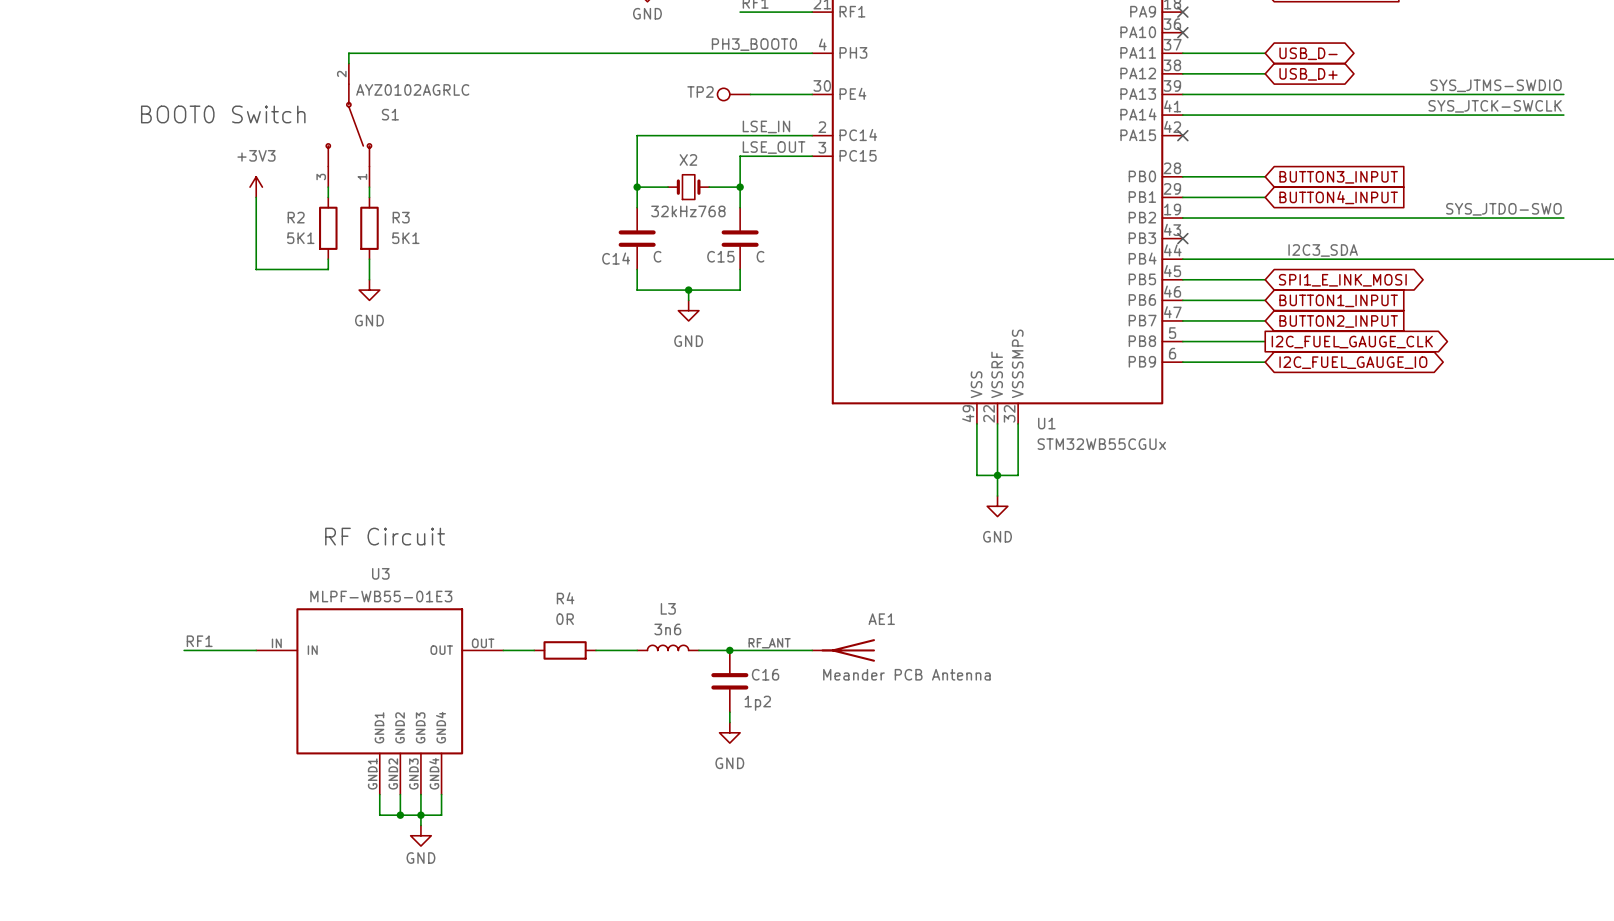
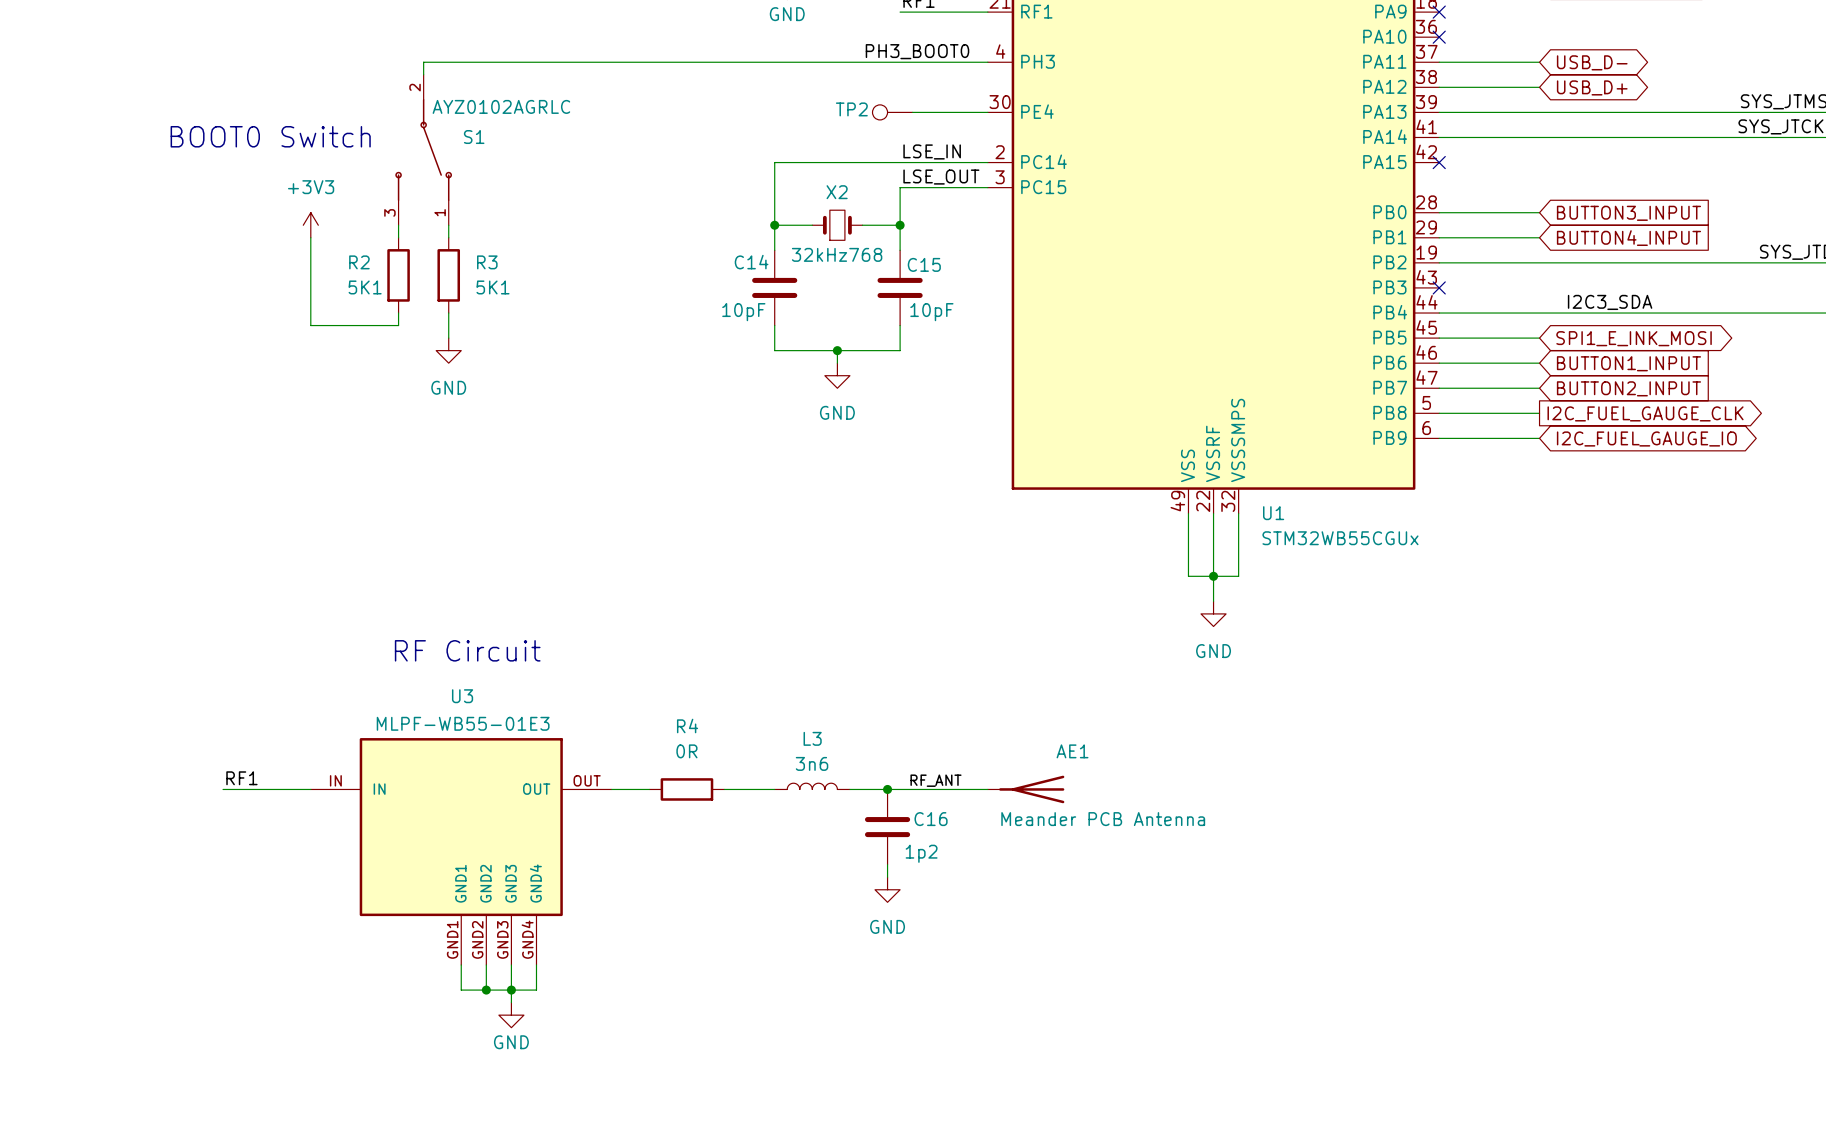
C14 value: C (657, 256) -> 10pF (743, 312)
C15 name position: C15 (720, 256) -> C15 (924, 264)
C15 value: C (760, 256) -> 10pF (931, 312)
C14 name position: C14 (616, 258) -> C14 (751, 262)

